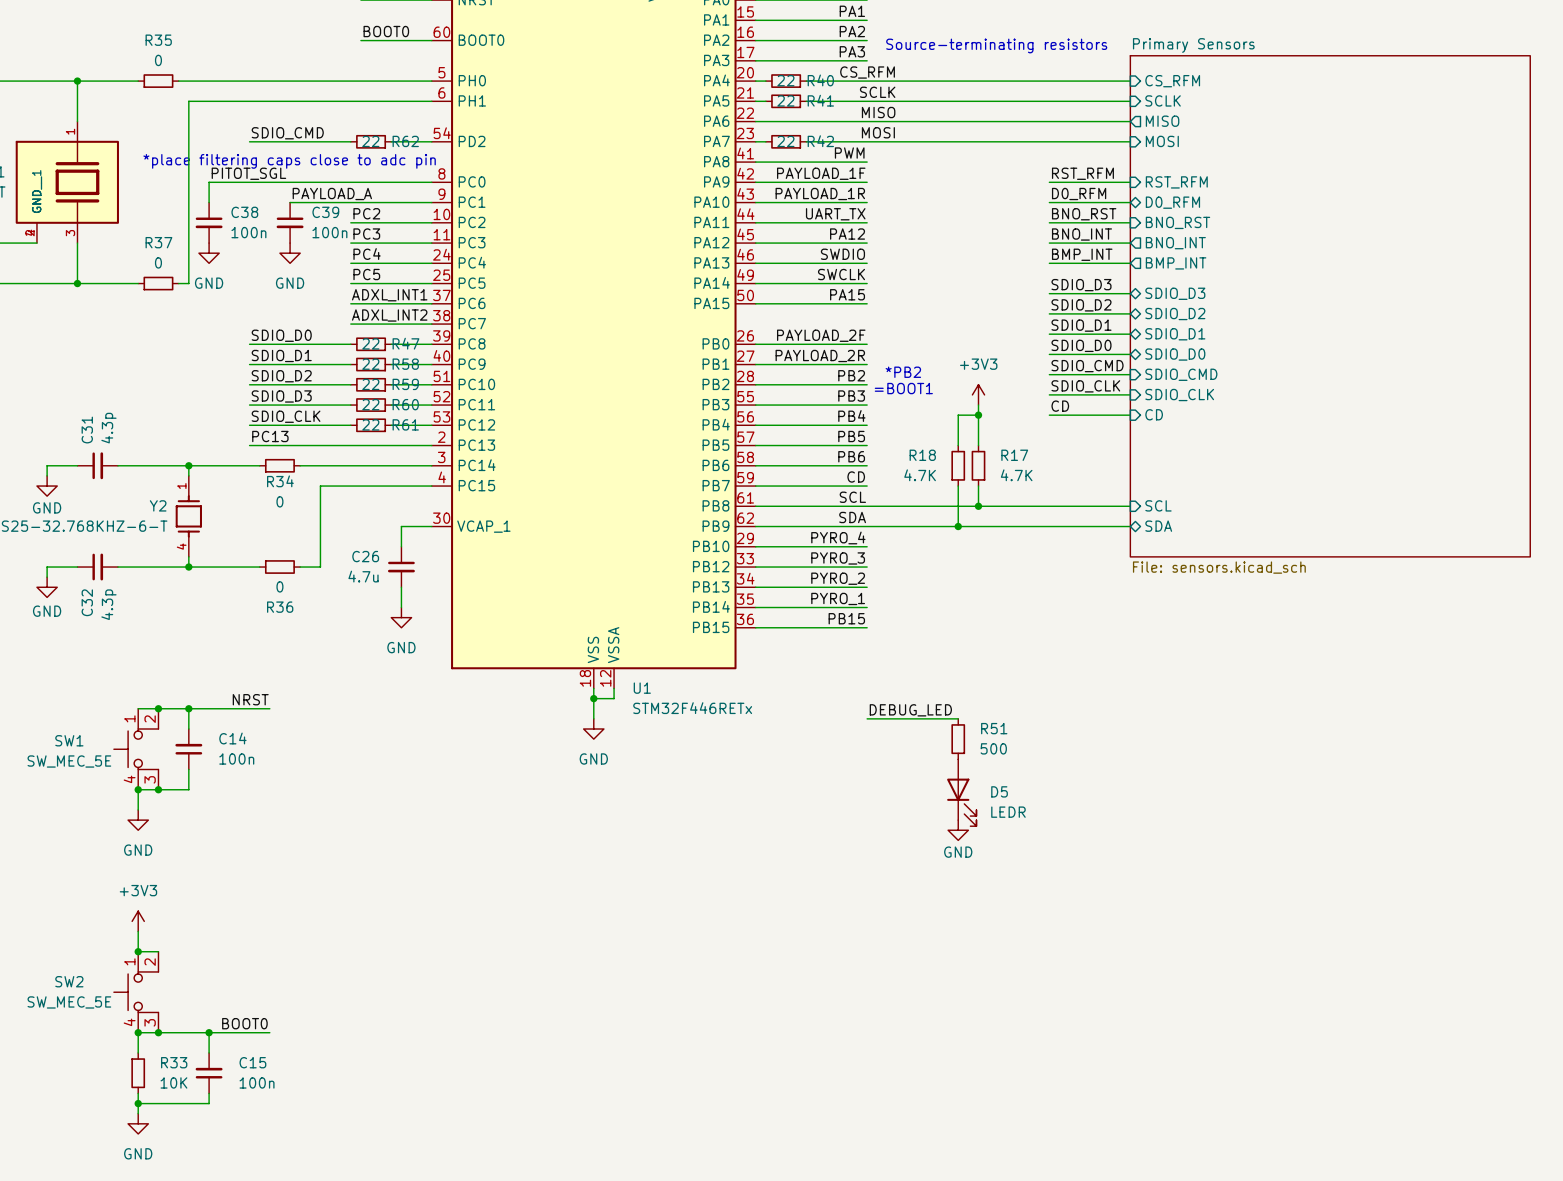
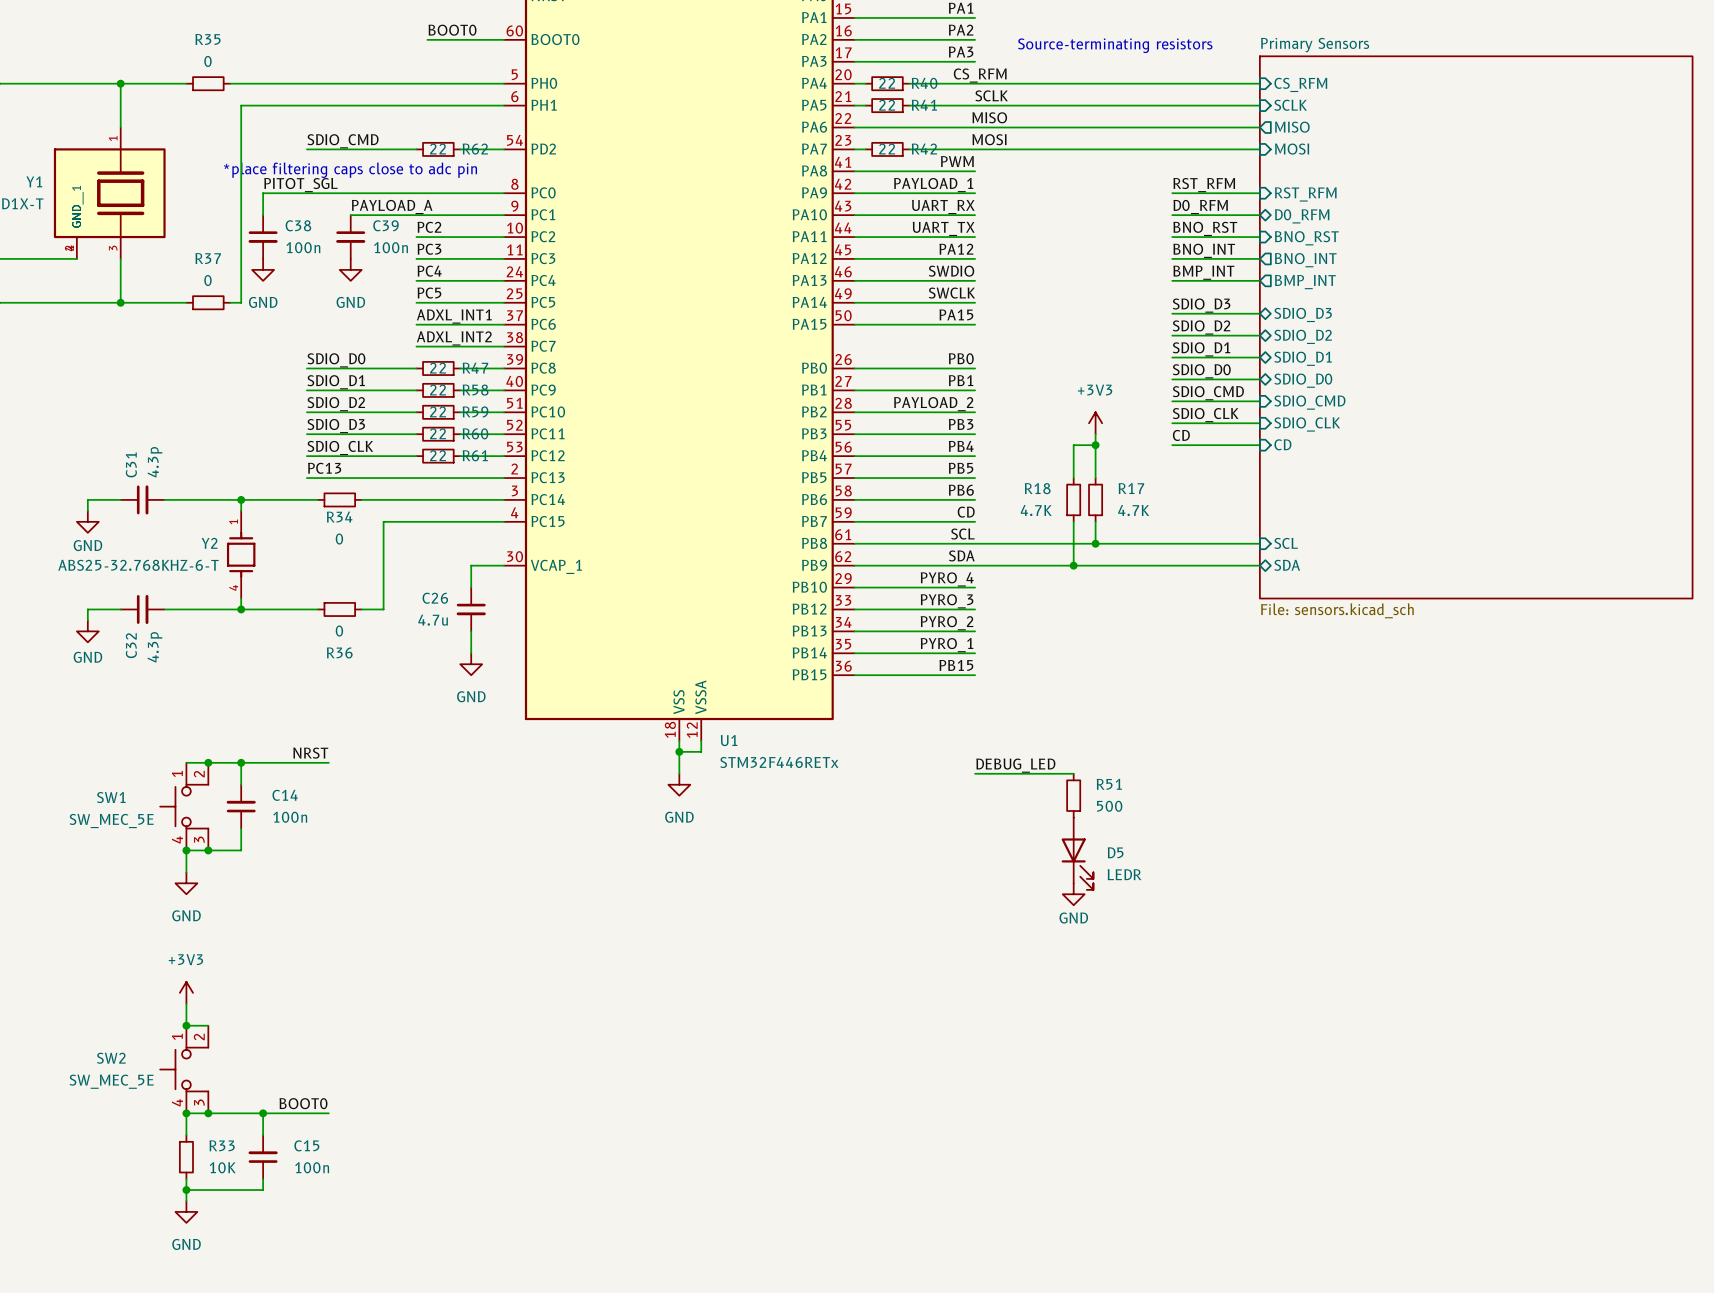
label: PAYLOAD_1F (821, 173) -> PAYLOAD_1 (933, 185)
label: PAYLOAD_1R (820, 194) -> UART_RX (943, 207)
label: PAYLOAD_2F (821, 335) -> PB0 (961, 358)
label: PAYLOAD_2R (820, 355) -> PB1 (961, 380)
text: *PB2 (903, 372) -> none
label: PB2 (851, 375) -> PAYLOAD_2 (933, 404)
text: =BOOT1 (903, 388) -> none

